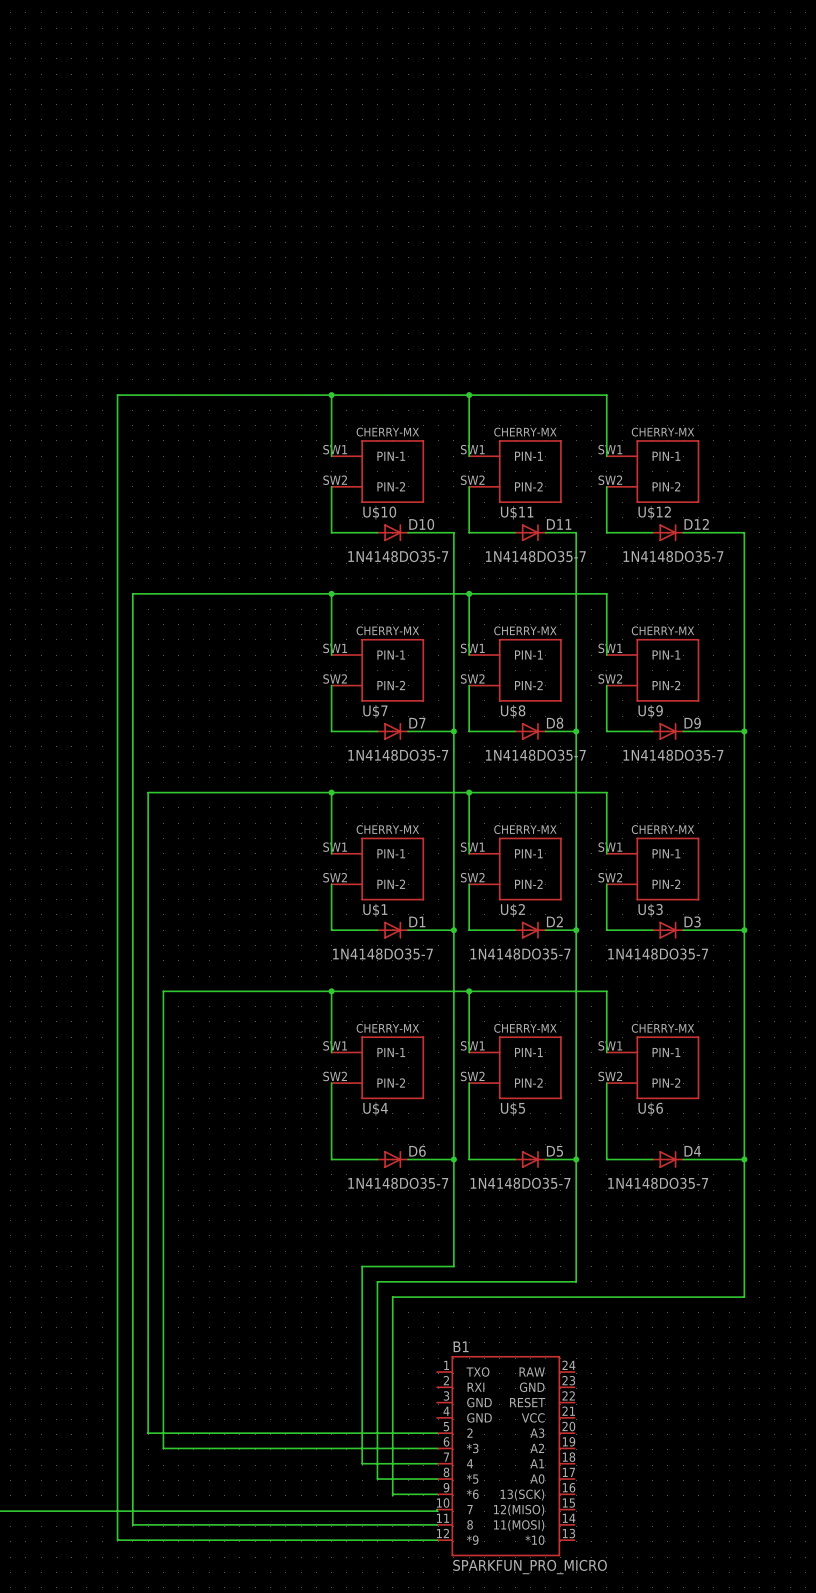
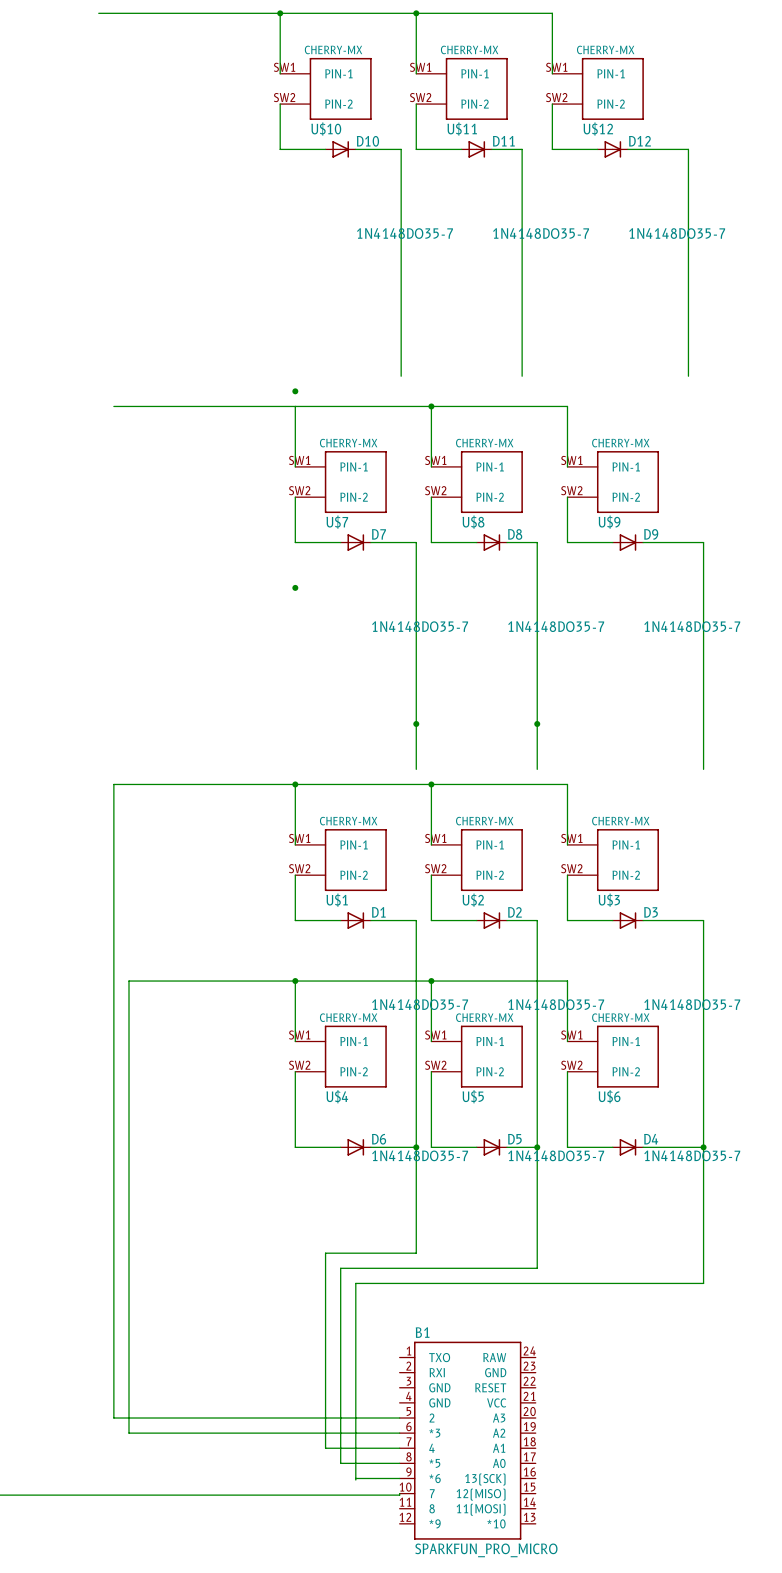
wire: none -> (98, 13) (552, 13) (552, 73)
wire: none -> (280, 13) (280, 73)
junction: none -> (280, 13)
wire: none -> (416, 13) (416, 73)
junction: none -> (416, 13)
wire: none -> (280, 104) (280, 149) (325, 149)
wire: none -> (416, 104) (416, 149) (461, 149)
wire: none -> (552, 104) (552, 149) (597, 149)
wire: none -> (355, 149) (401, 149) (401, 376)
wire: none -> (491, 149) (522, 149) (522, 376)
wire: none -> (627, 149) (688, 149) (688, 376)
wire: (331, 395) (331, 410) -> none
wire: (469, 395) (469, 410) -> none
junction position: (469, 395) -> (431, 406)
wire: (606, 410) (606, 395) (117, 395) (117, 1540) (437, 1540) -> (567, 406) (113, 406)
U$10 position: (377, 471) -> (325, 88)
U$11 position: (515, 471) -> (462, 88)
U$12 position: (653, 471) -> (598, 88)
wire: (331, 486) (331, 502) -> (295, 451) (295, 466)
wire: (469, 486) (469, 502) -> (431, 451) (431, 466)
wire: (606, 486) (606, 502) -> (567, 451) (567, 466)
wire: (331, 532) (377, 532) -> (295, 527) (295, 542) (340, 542)
D10 position: (392, 532) -> (340, 149)
wire: (408, 532) (453, 532) (453, 547) -> (370, 542) (416, 542)
wire: (469, 532) (515, 532) -> (431, 527) (431, 542) (476, 542)
D11 position: (530, 532) -> (476, 149)
wire: (545, 532) (576, 532) (576, 547) -> (507, 542) (537, 542)
wire: (606, 532) (652, 532) -> (567, 527) (567, 542) (612, 542)
D12 position: (667, 532) -> (612, 149)
wire: (683, 532) (744, 532) (744, 547) -> (643, 542) (703, 542)
D10 value position: 1N4148DO35-7 (398, 556) -> 1N4148DO35-7 (404, 233)
D11 value position: 1N4148DO35-7 (535, 556) -> 1N4148DO35-7 (541, 233)
D12 value position: 1N4148DO35-7 (673, 556) -> 1N4148DO35-7 (677, 233)
wire: (331, 593) (331, 655) -> none
wire: (469, 593) (469, 655) -> none
junction: (469, 593) -> none
wire: (606, 655) (606, 593) (132, 593) (132, 1524) (437, 1524) -> none
U$7 position: (377, 670) -> (341, 482)
U$8 position: (515, 670) -> (477, 482)
U$9 position: (653, 670) -> (613, 482)
wire: (331, 685) (331, 731) (377, 731) -> none
wire: (469, 685) (469, 731) (515, 731) -> none
wire: (606, 685) (606, 731) (652, 731) -> none
D7 position: (392, 731) -> (355, 542)
wire: (408, 731) (453, 731) -> none
D8 position: (530, 731) -> (491, 542)
wire: (545, 731) (576, 731) -> none
D9 position: (667, 731) -> (627, 542)
wire: (683, 731) (744, 731) -> none
junction: (744, 731) -> none
D7 value position: 1N4148DO35-7 (398, 755) -> 1N4148DO35-7 (420, 626)
D8 value position: 1N4148DO35-7 (535, 755) -> 1N4148DO35-7 (556, 626)
D9 value position: 1N4148DO35-7 (673, 755) -> 1N4148DO35-7 (692, 626)
wire: (453, 777) (453, 930) -> none
wire: (576, 777) (576, 930) -> none
wire: (744, 777) (744, 930) -> none
junction: (453, 930) -> none
junction: (576, 930) -> none
junction: (744, 930) -> none
D1 value position: 1N4148DO35-7 (382, 954) -> 1N4148DO35-7 (420, 1004)
D2 value position: 1N4148DO35-7 (520, 954) -> 1N4148DO35-7 (556, 1004)
D3 value position: 1N4148DO35-7 (658, 954) -> 1N4148DO35-7 (692, 1004)
D6 value position: 1N4148DO35-7 (398, 1183) -> 1N4148DO35-7 (420, 1155)
D5 value position: 1N4148DO35-7 (520, 1183) -> 1N4148DO35-7 (556, 1155)
D4 value position: 1N4148DO35-7 (658, 1183) -> 1N4148DO35-7 (692, 1155)

